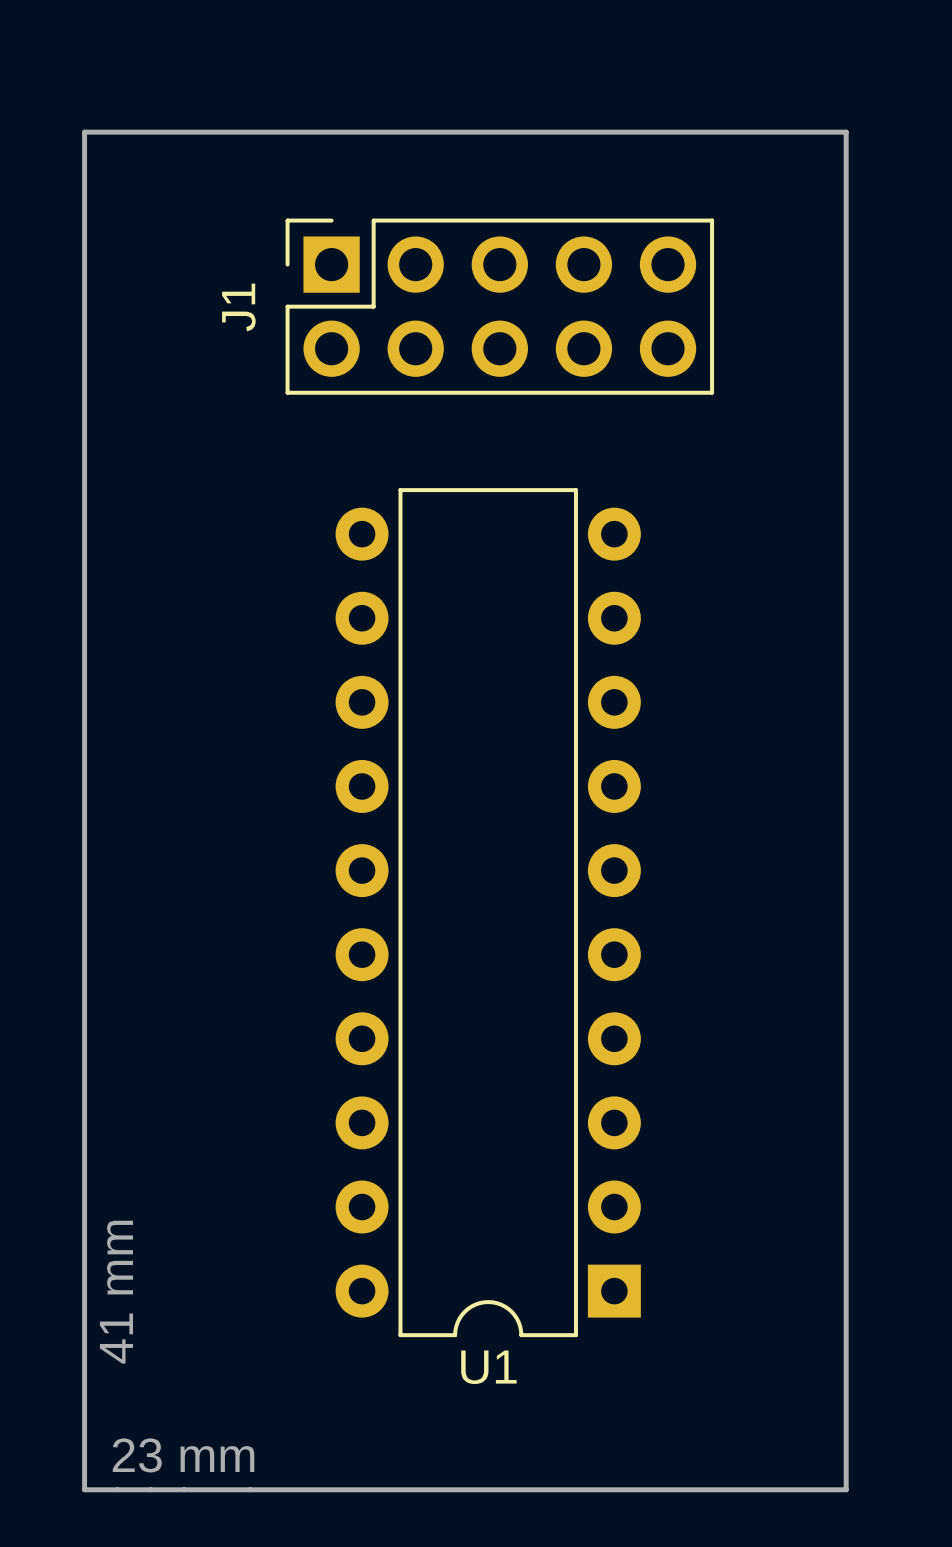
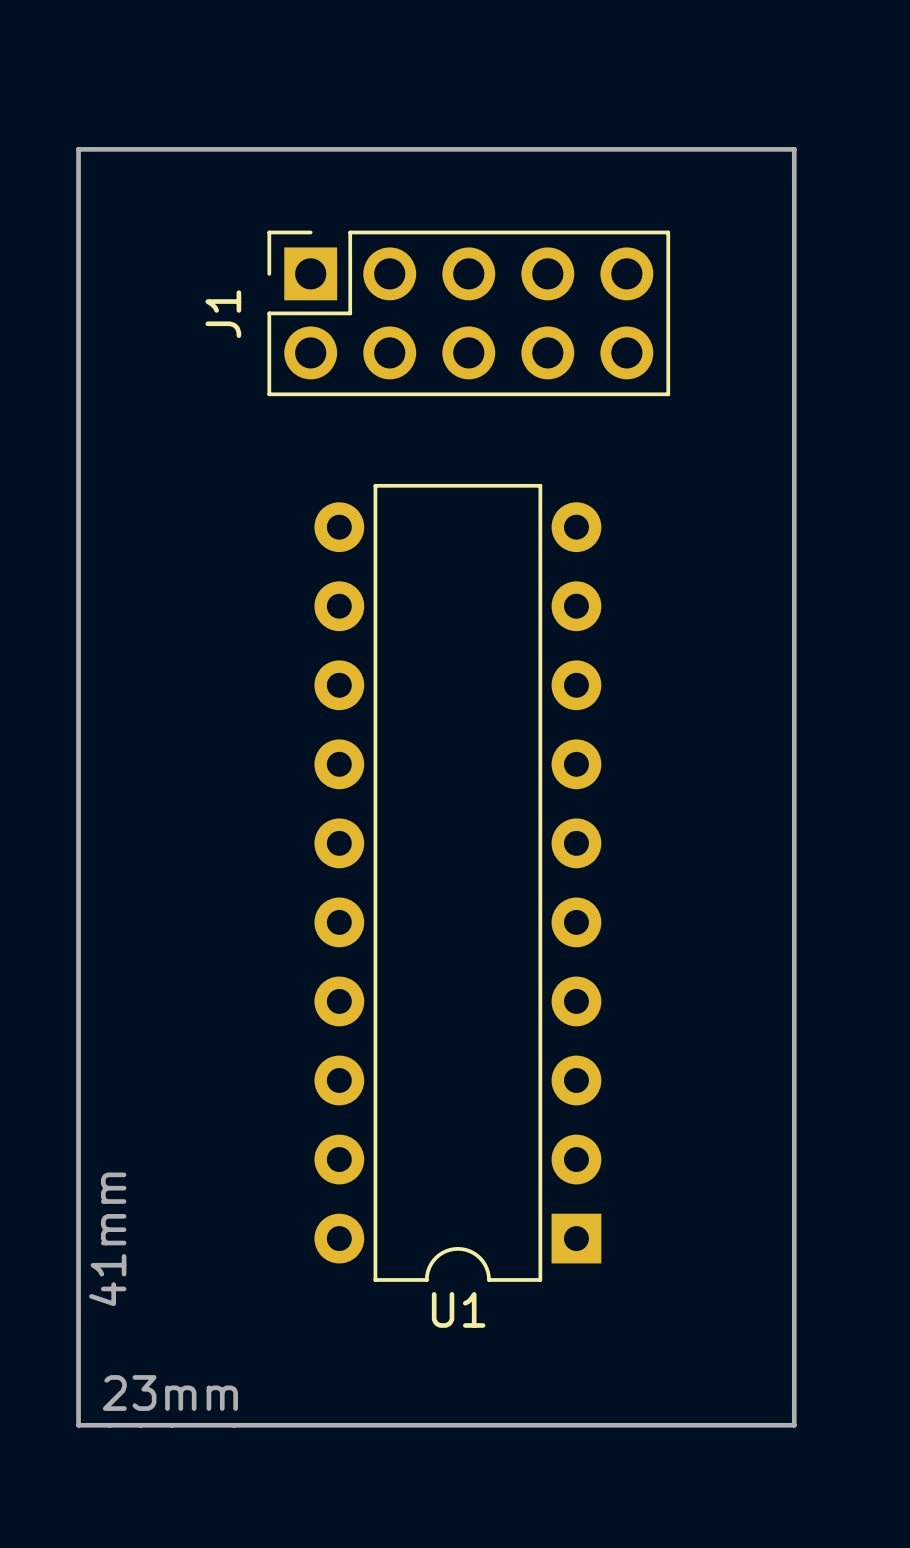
text: 41 mm (116, 1292) -> 41mm (107, 1239)
text: 23 mm (183, 1455) -> 23mm (170, 1393)

